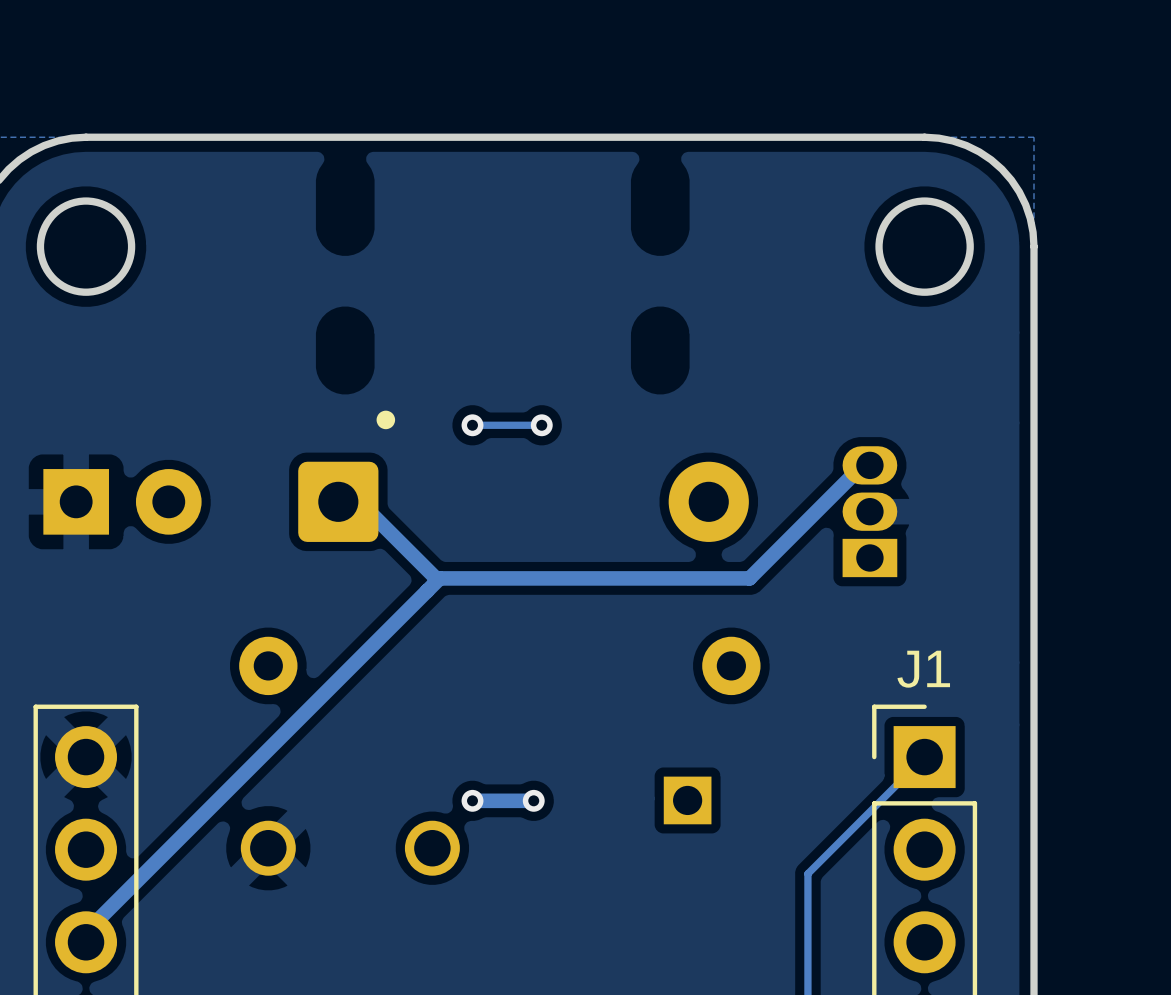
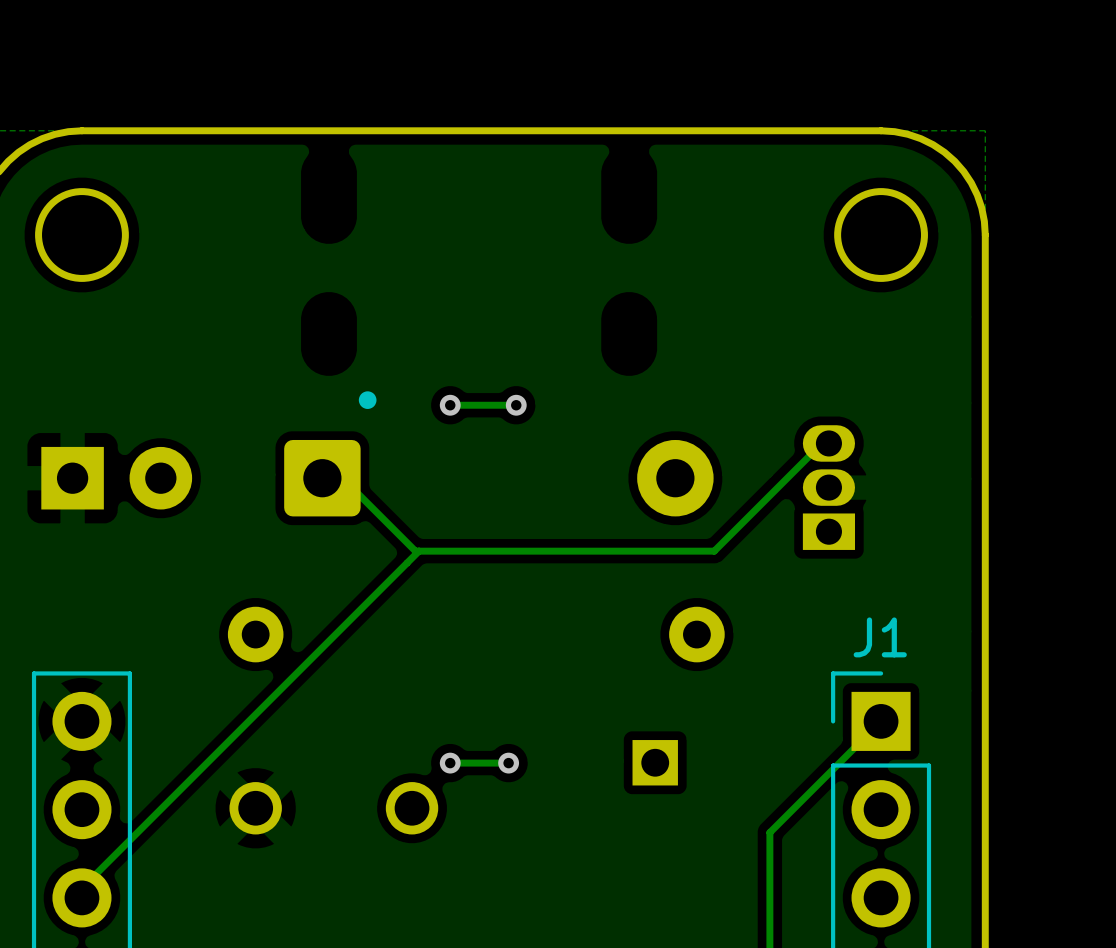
track width: thick (869, 465) (862, 465) (749, 578) (436, 578) (359, 501) (338, 501) -> thin (828, 443) (821, 443) (714, 551) (415, 551) (342, 478) (322, 478)
track width: thick (439, 578) (86, 932) -> thin (418, 551) (81, 888)
track width: thick (533, 800) (472, 800) -> thin (508, 763) (450, 763)

